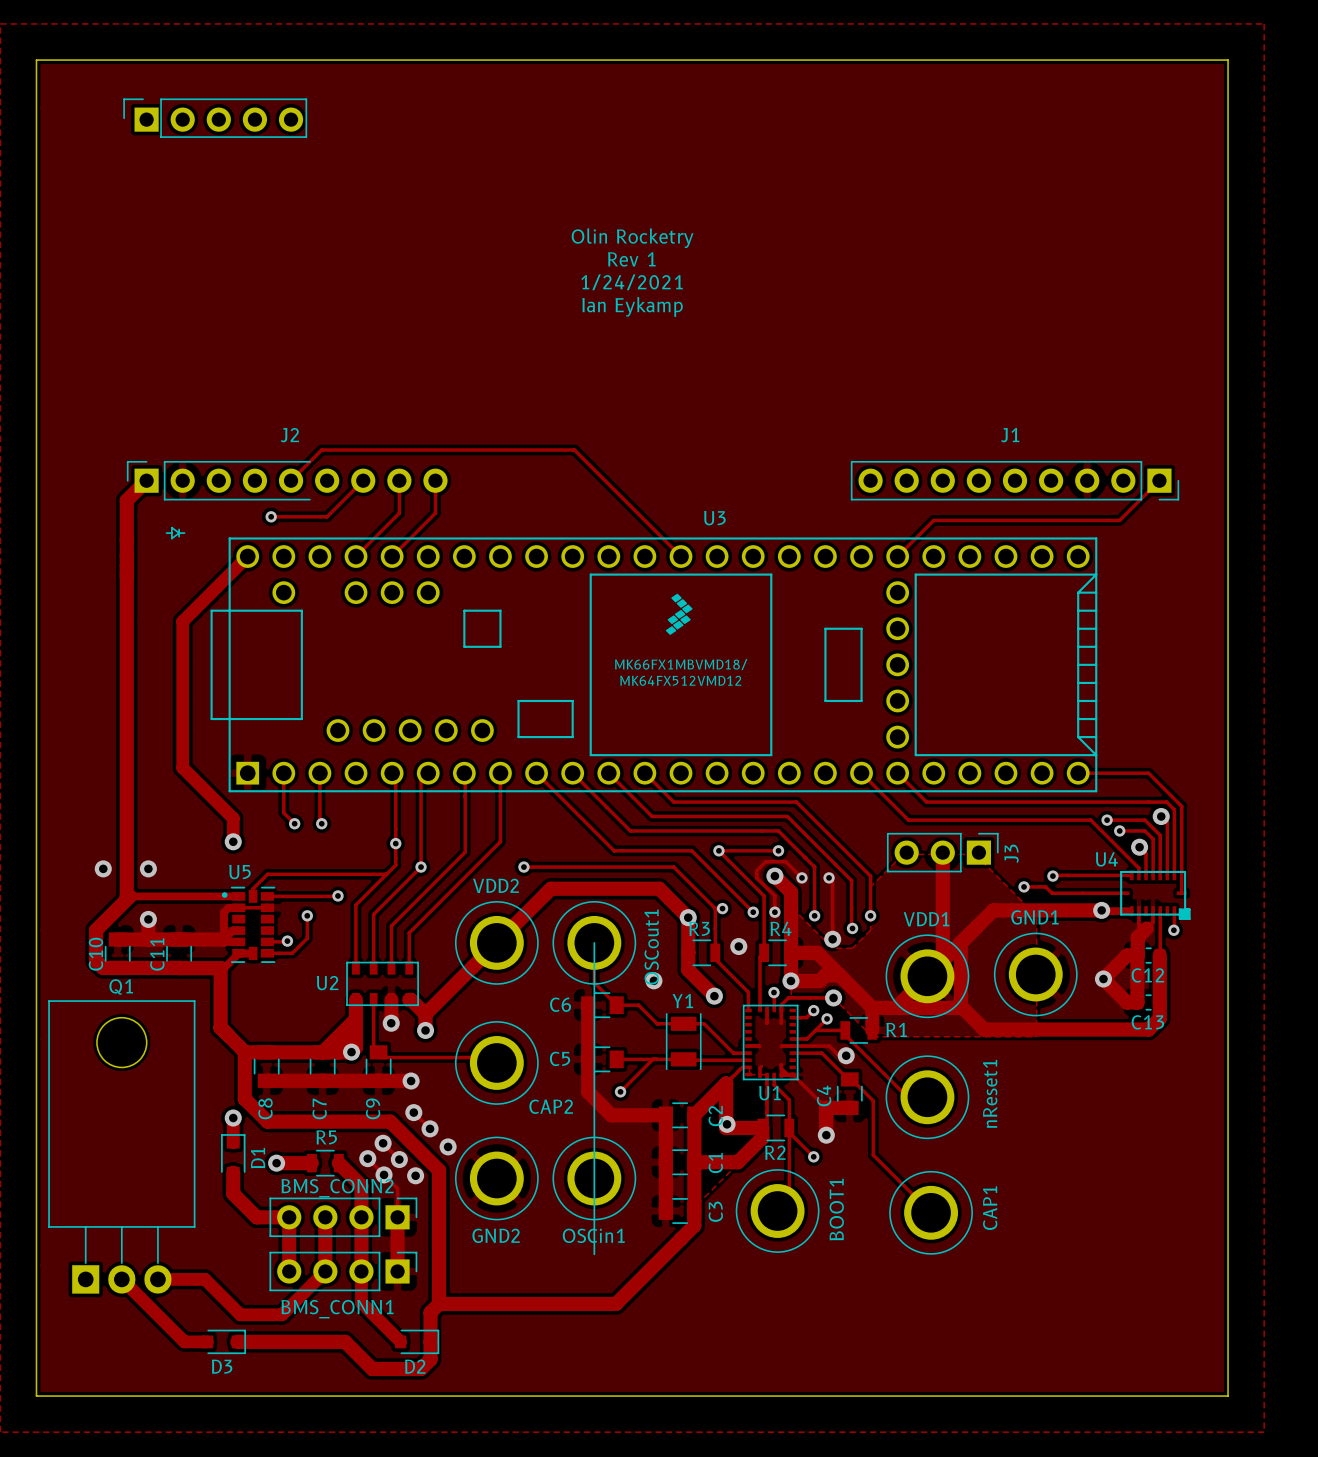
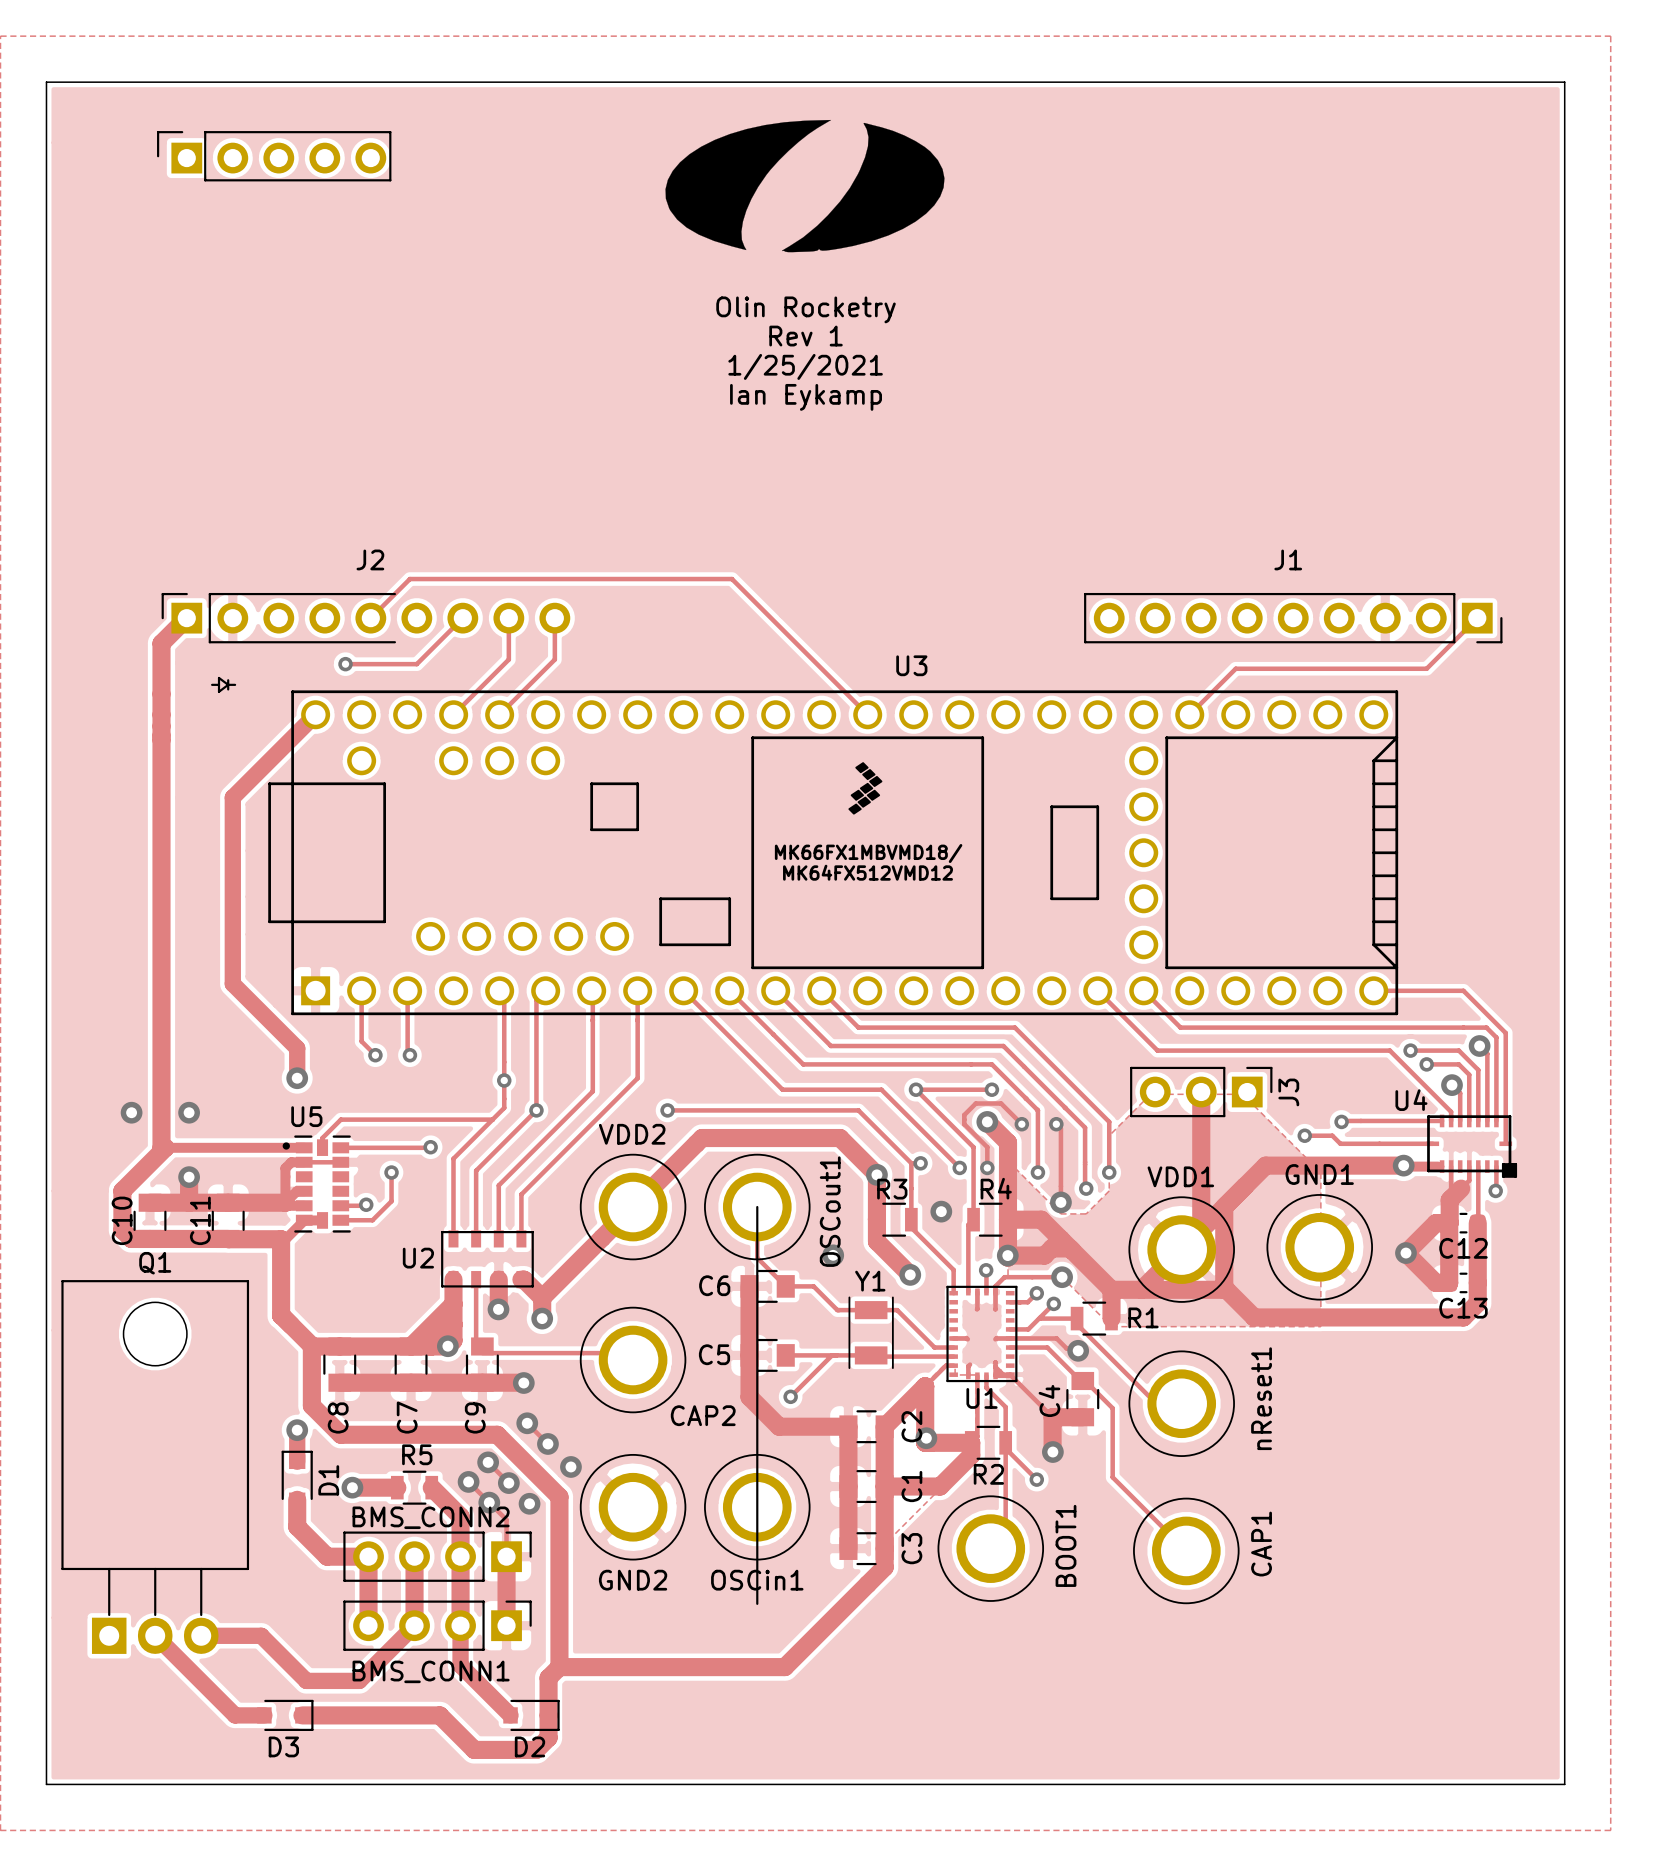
drawing: none -> [665, 119, 945, 253]
text: 1/24/2021 (632, 282) -> 1/25/2021 (805, 366)
track: (969, 520) (933, 520) (897, 556) -> (1235, 668) (1189, 714)

